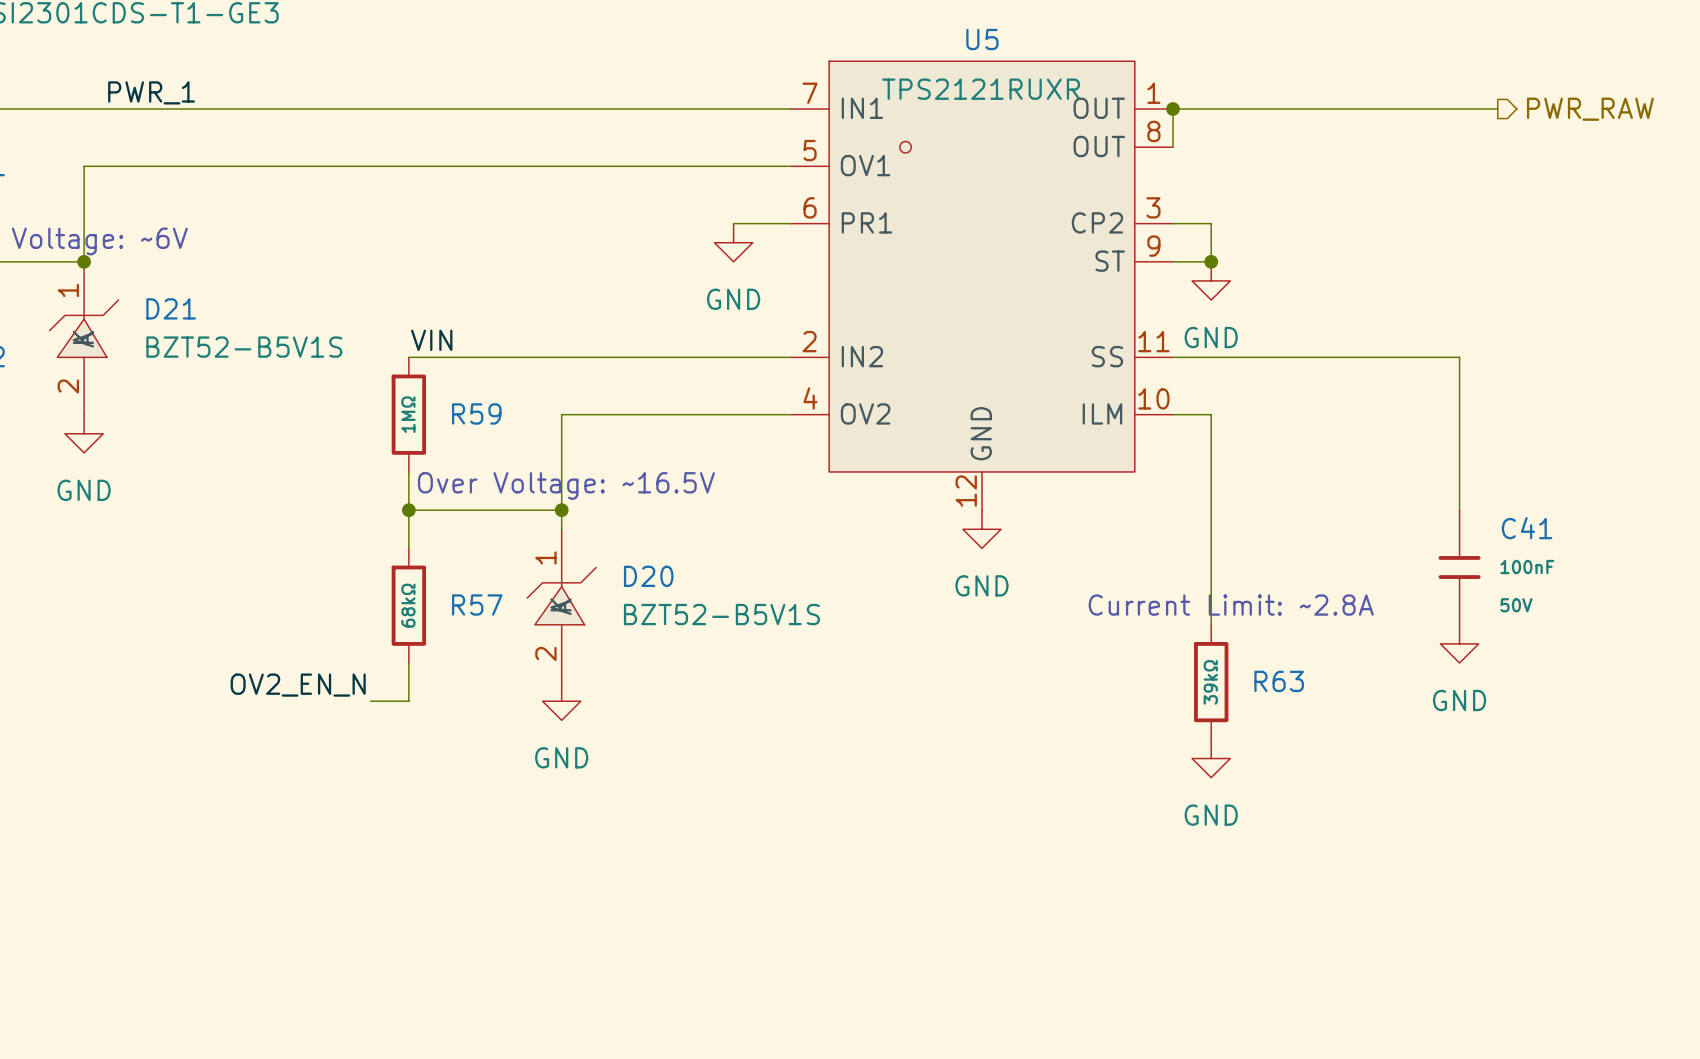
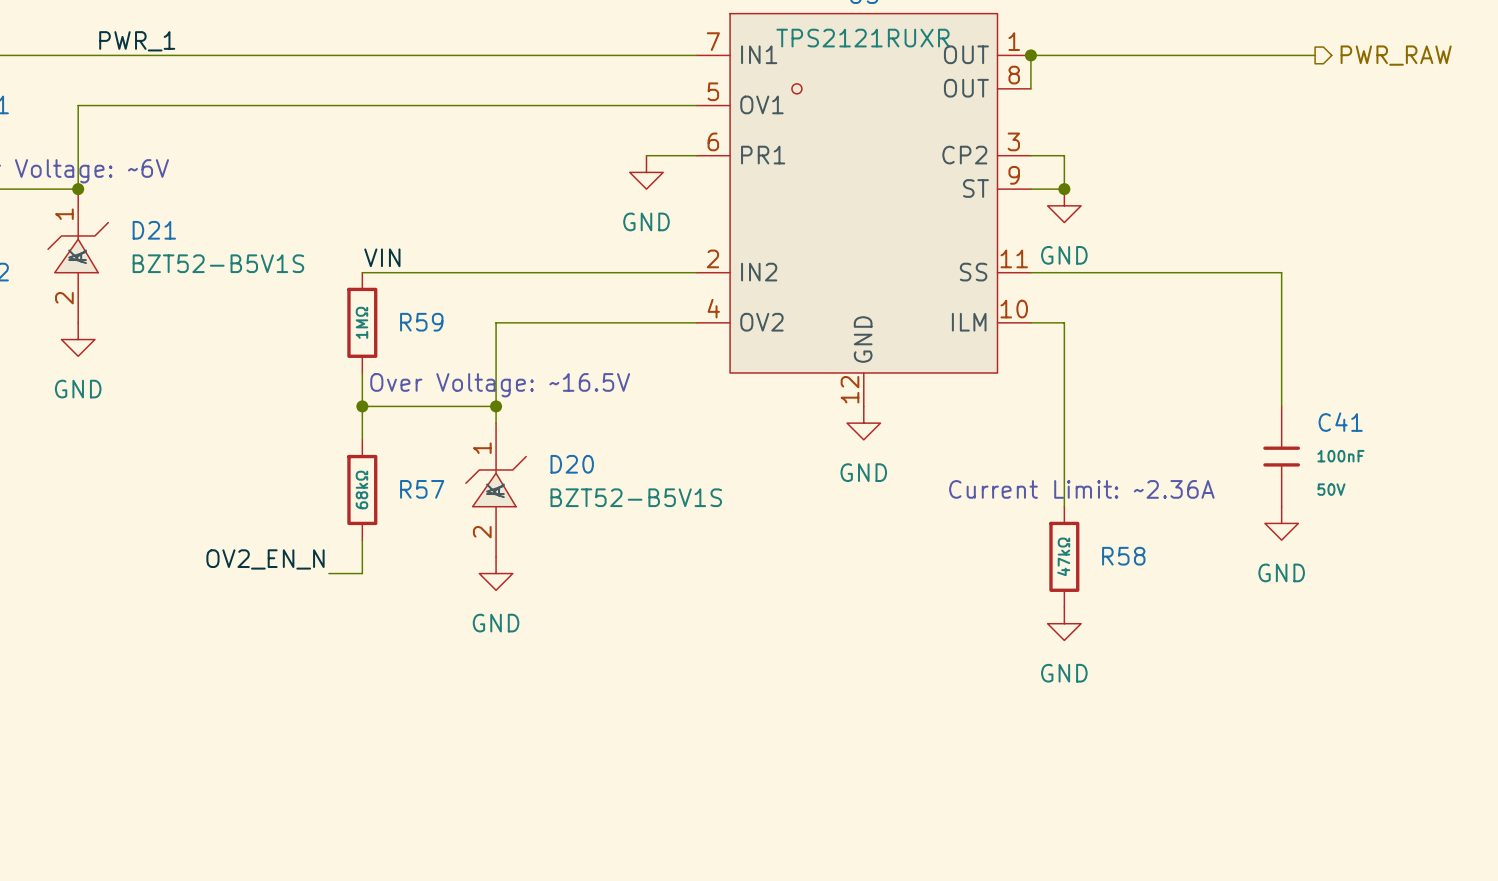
text: Current Limit: ~2.8A (1231, 605) -> Current Limit: ~2.36A (1081, 489)
R63 name: R63 (1279, 681) -> R58 (1123, 556)
R63 value: 39kΩ (1210, 682) -> 47kΩ (1063, 556)

